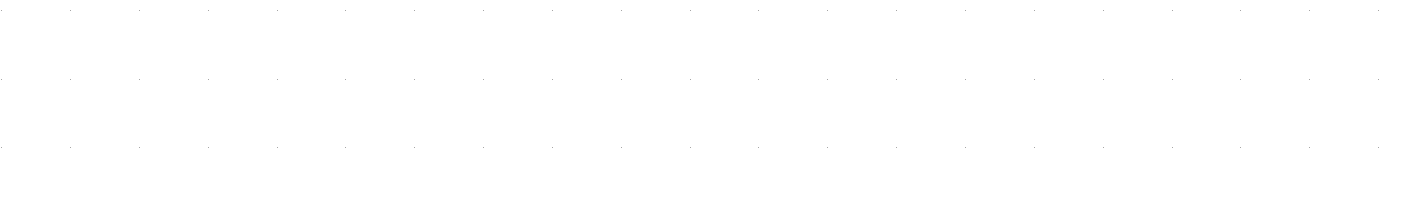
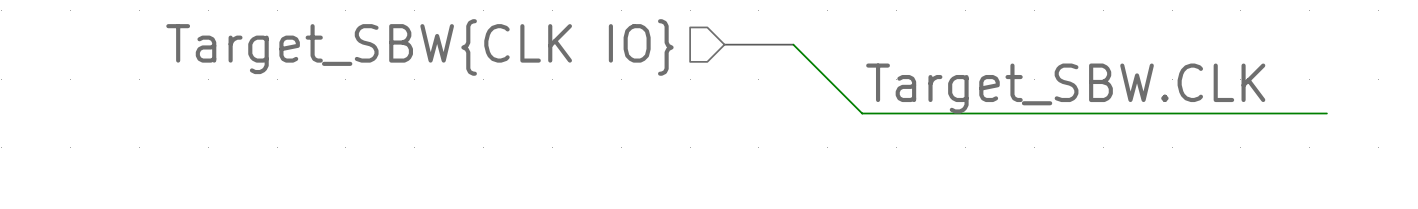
bus: none -> (724, 44) (793, 44)
wire: none -> (793, 44) (862, 113) (1326, 113)
hierarchical label: none -> Target_SBW{CLK IO} (419, 47)
label: none -> Target_SBW.CLK (1065, 88)

